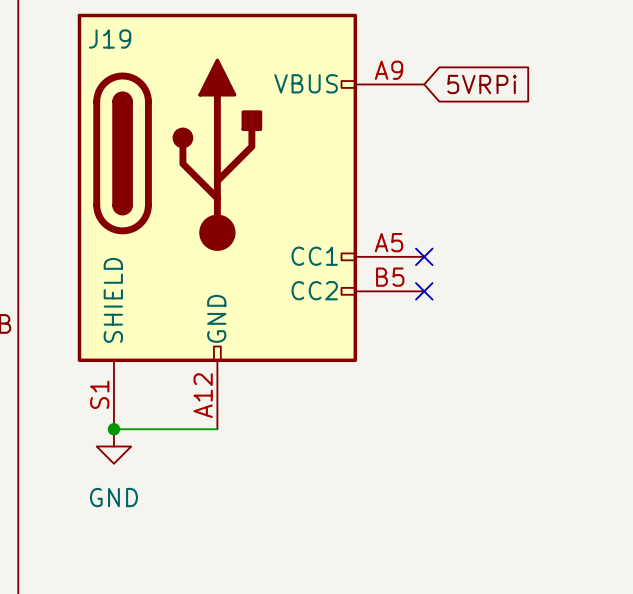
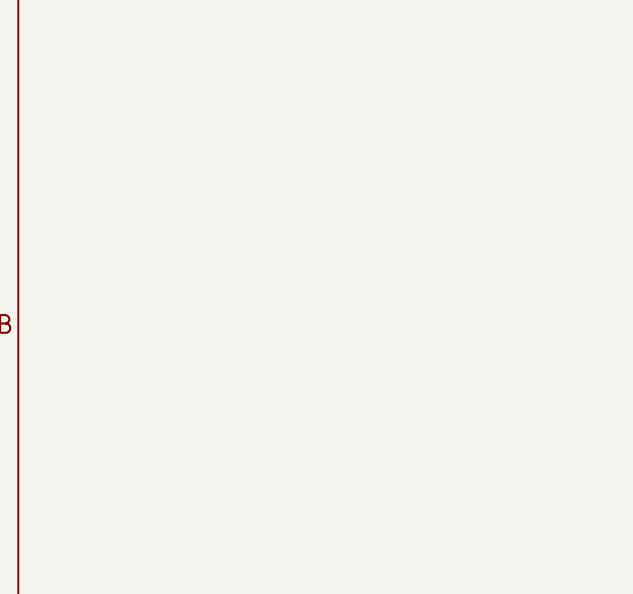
global label: 5VRPi (481, 84) -> none
J19: (251, 221) -> none
no-connect mark: (424, 256) -> none
no-connect mark: (424, 291) -> none
wire: (113, 429) (217, 429) -> none
junction: (113, 429) -> none
power symbol: GND (113, 446) -> none

